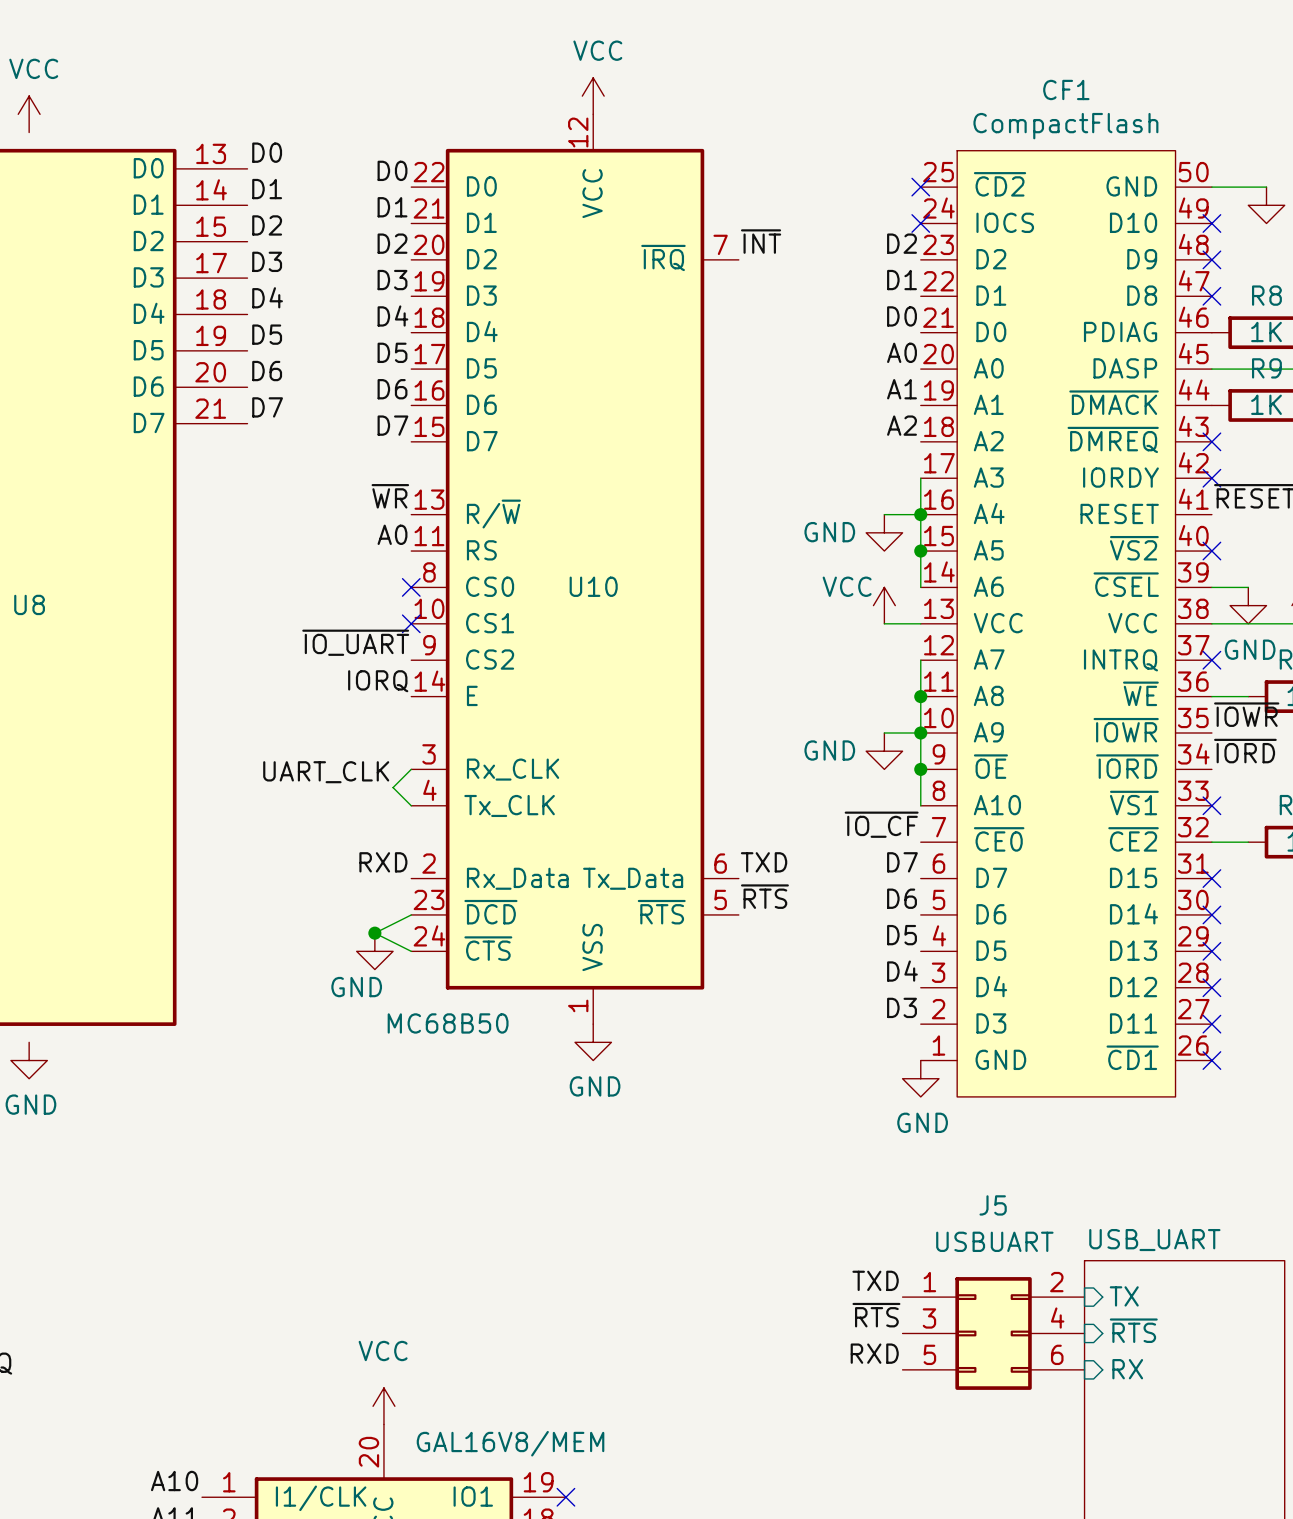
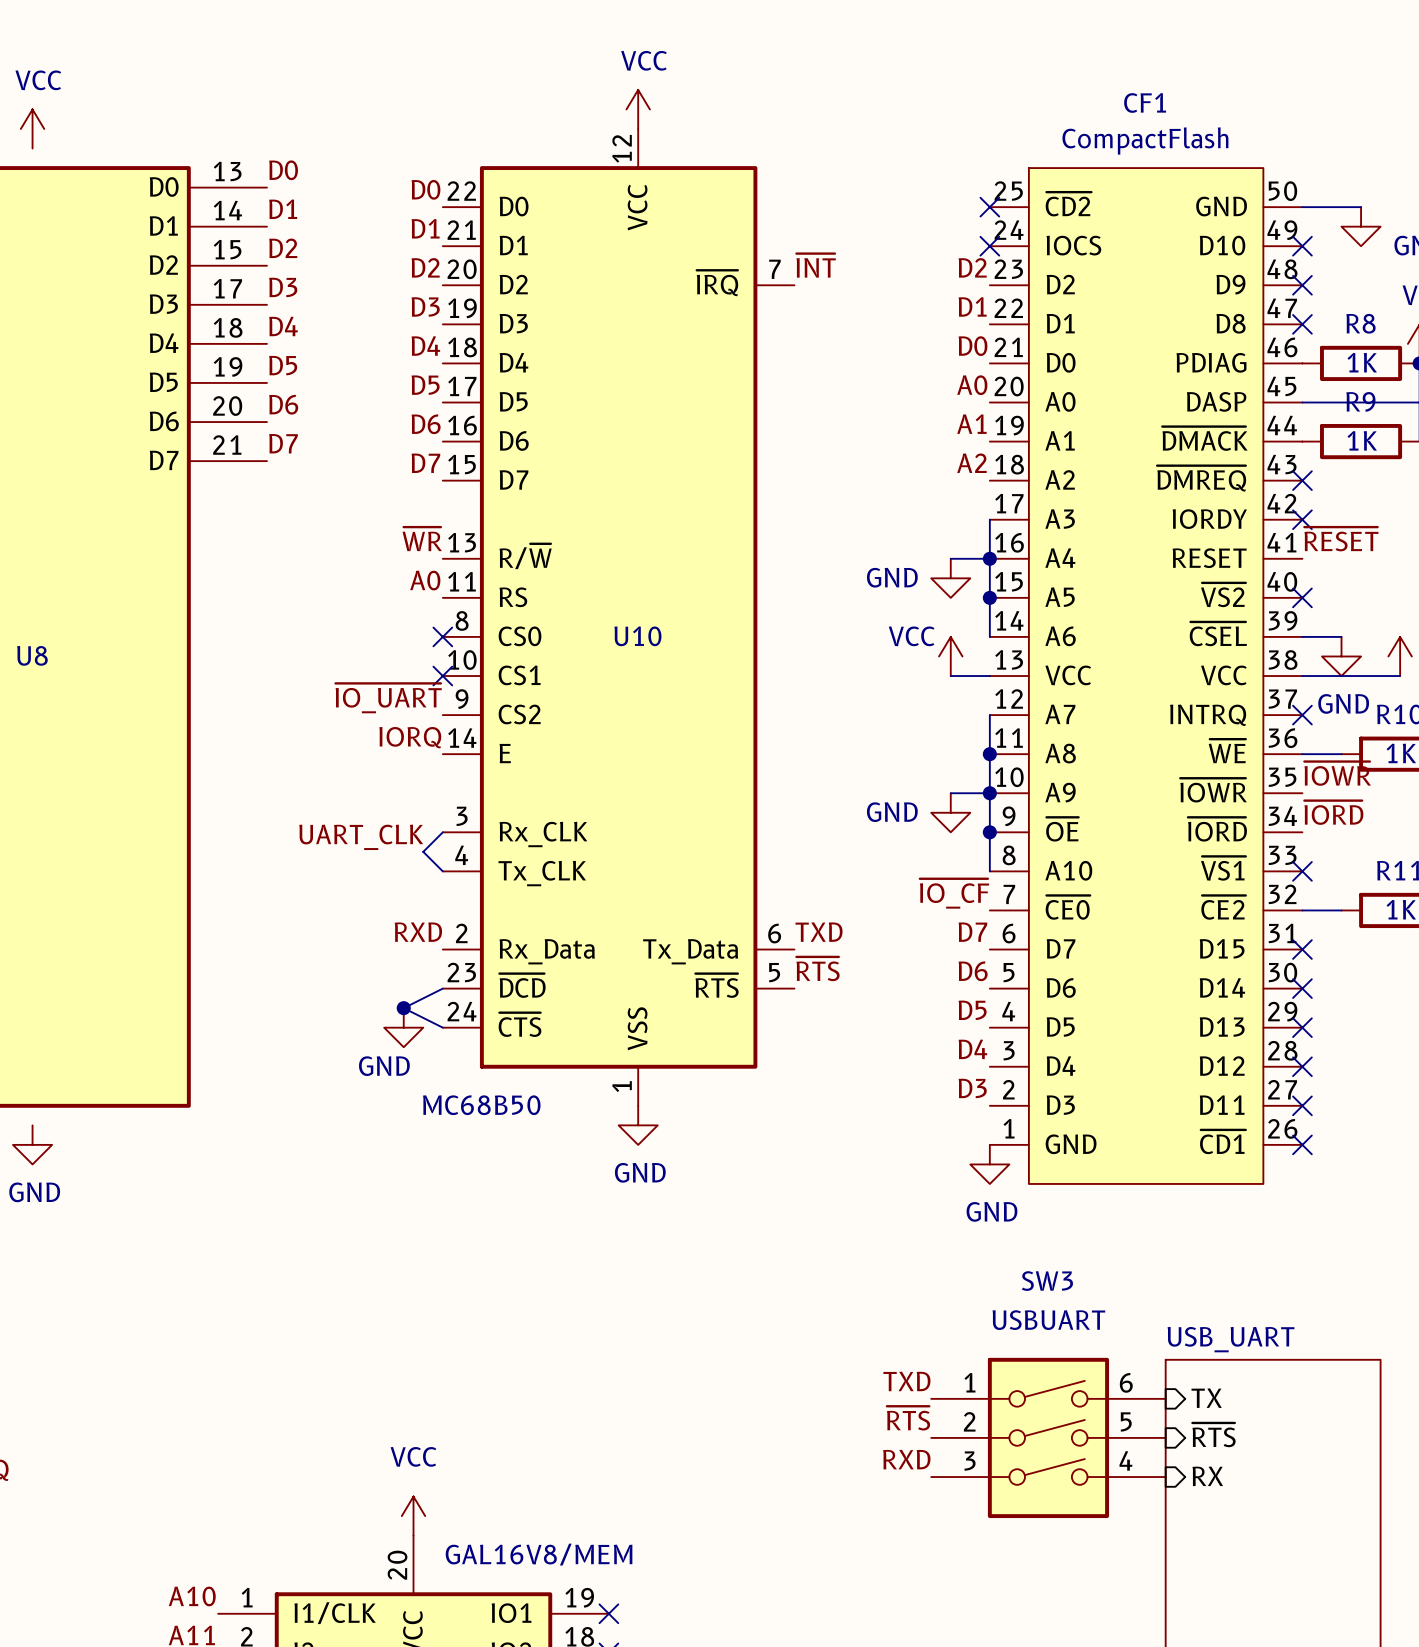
label position: TXD (875, 1280) -> TXD (906, 1381)
label position: ~{RTS} (876, 1315) -> ~{RTS} (908, 1418)
SW3: none -> USBUART (1048, 1437)
J5: USBUART (993, 1333) -> none
label position: RXD (874, 1353) -> RXD (906, 1459)

